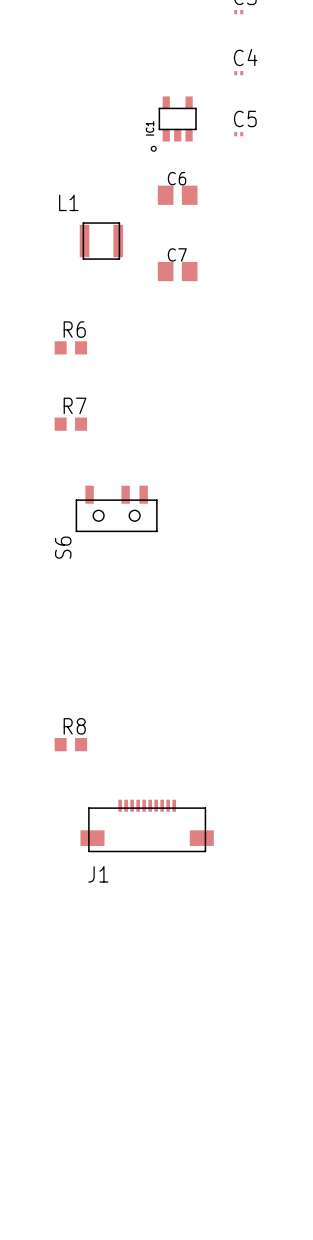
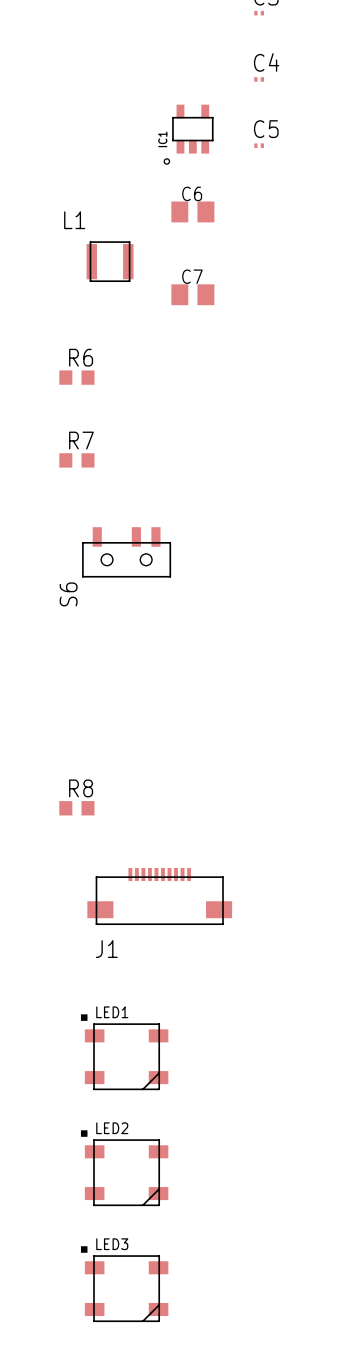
LED1: none -> (124, 1052)
LED2: none -> (124, 1168)
LED3: none -> (124, 1284)

